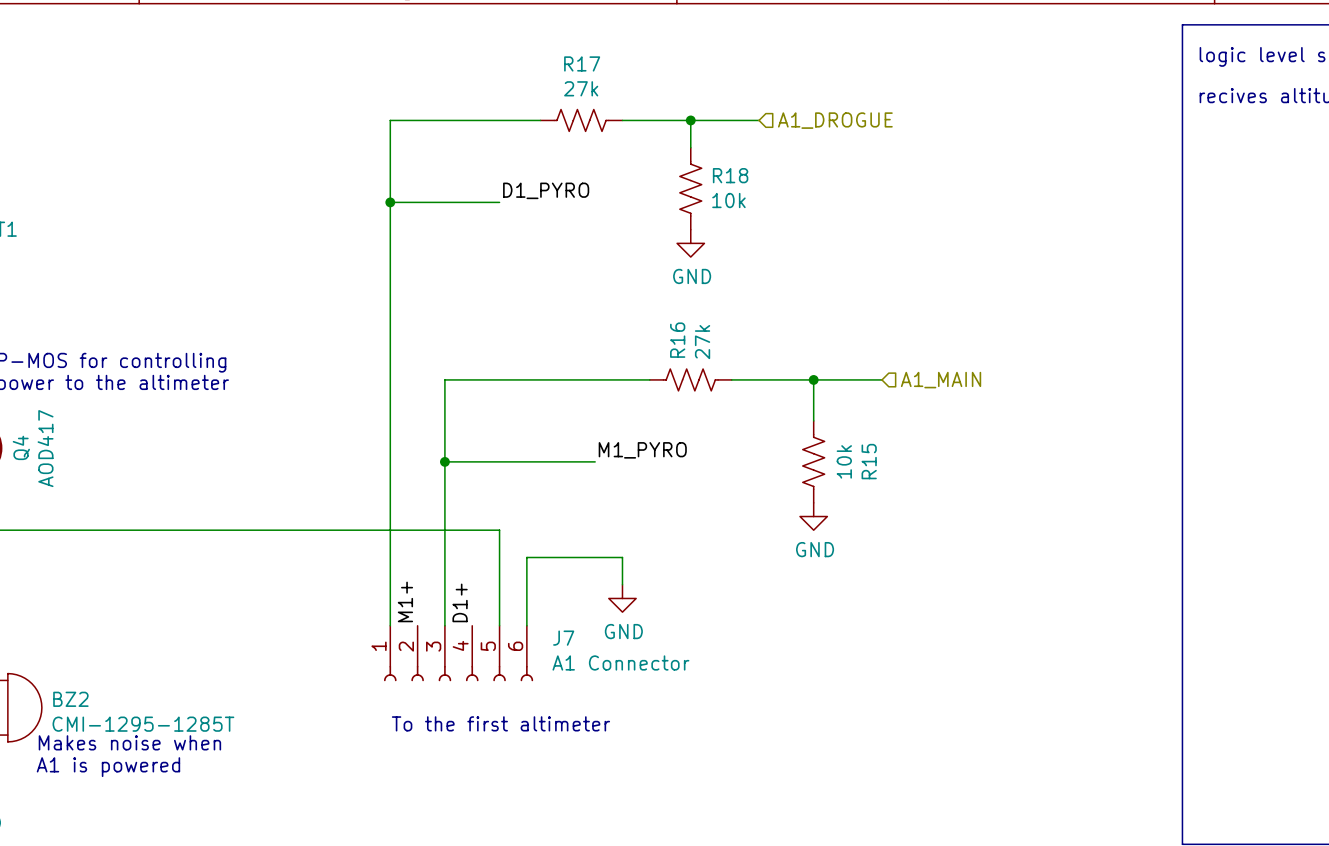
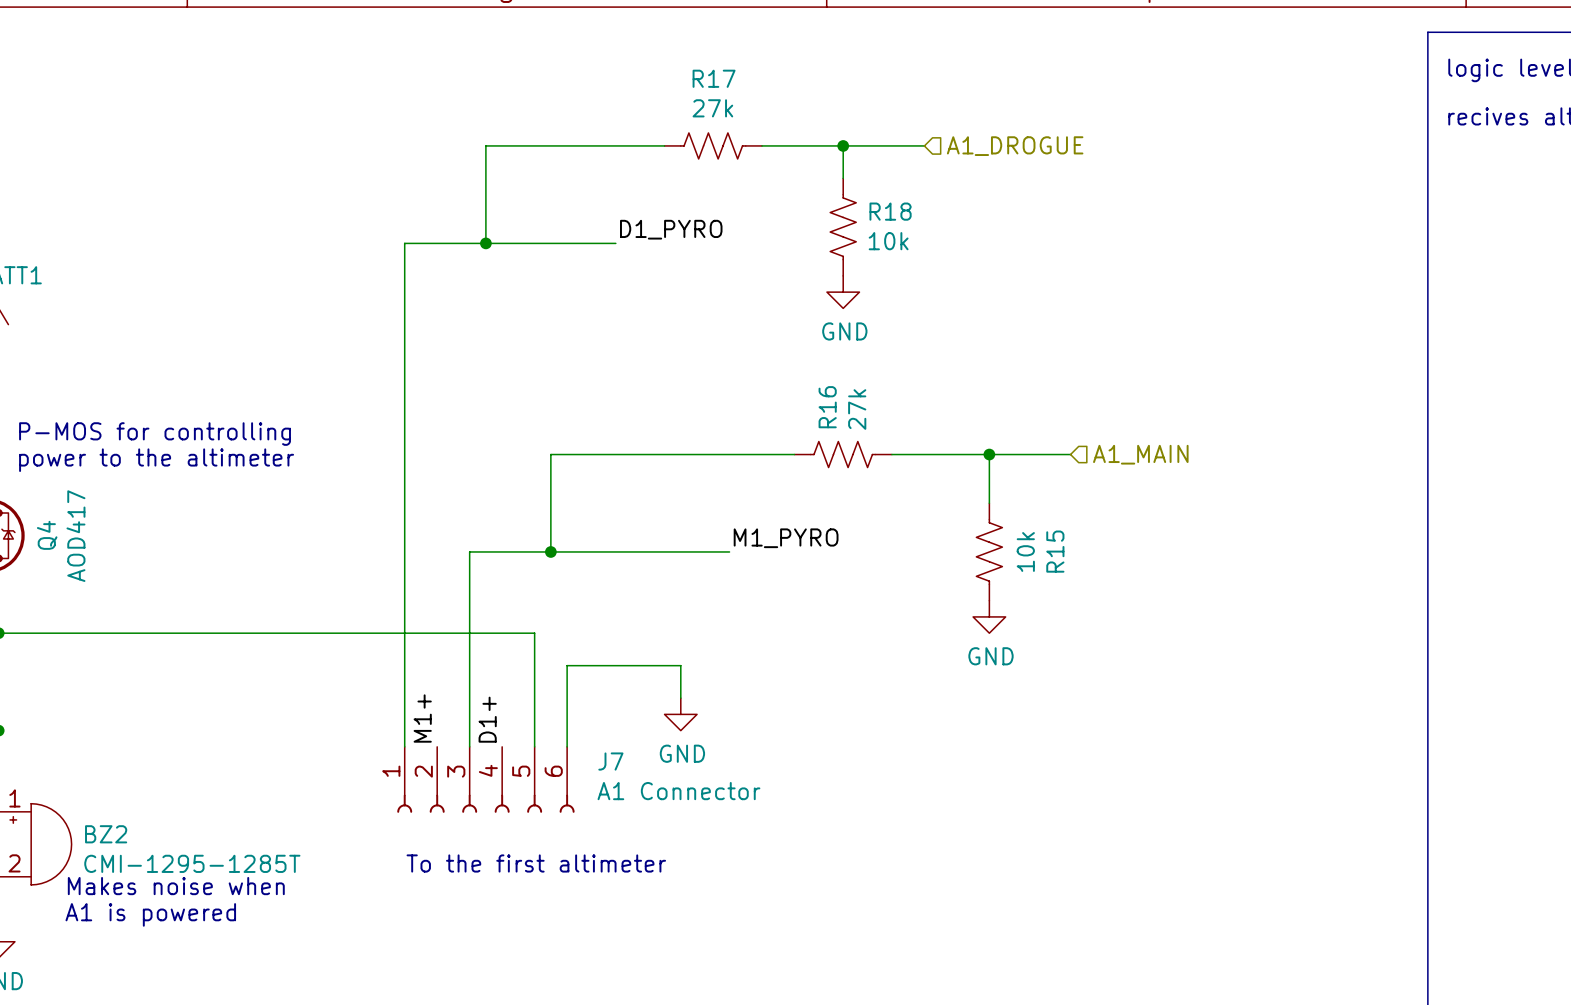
wire: (390, 202) (390, 625) -> (485, 243) (404, 243) (404, 746)
wire: (444, 461) (444, 625) -> (550, 551) (469, 551) (469, 746)
wire: (431, 530) (499, 530) (499, 625) -> (534, 633) (534, 746)
wire: (526, 557) (526, 625) -> (648, 665) (567, 665) (567, 746)
wire: (554, 557) (622, 557) (622, 584) -> (680, 665) (680, 698)
power symbol position: GND (622, 598) -> GND (680, 714)
label position: M1+ (405, 601) -> M1+ (422, 718)
label position: D1+ (460, 602) -> D1+ (487, 719)
J7 position: (458, 653) -> (485, 779)
text position: To the first altimeter (500, 723) -> To the first altimeter (536, 863)

